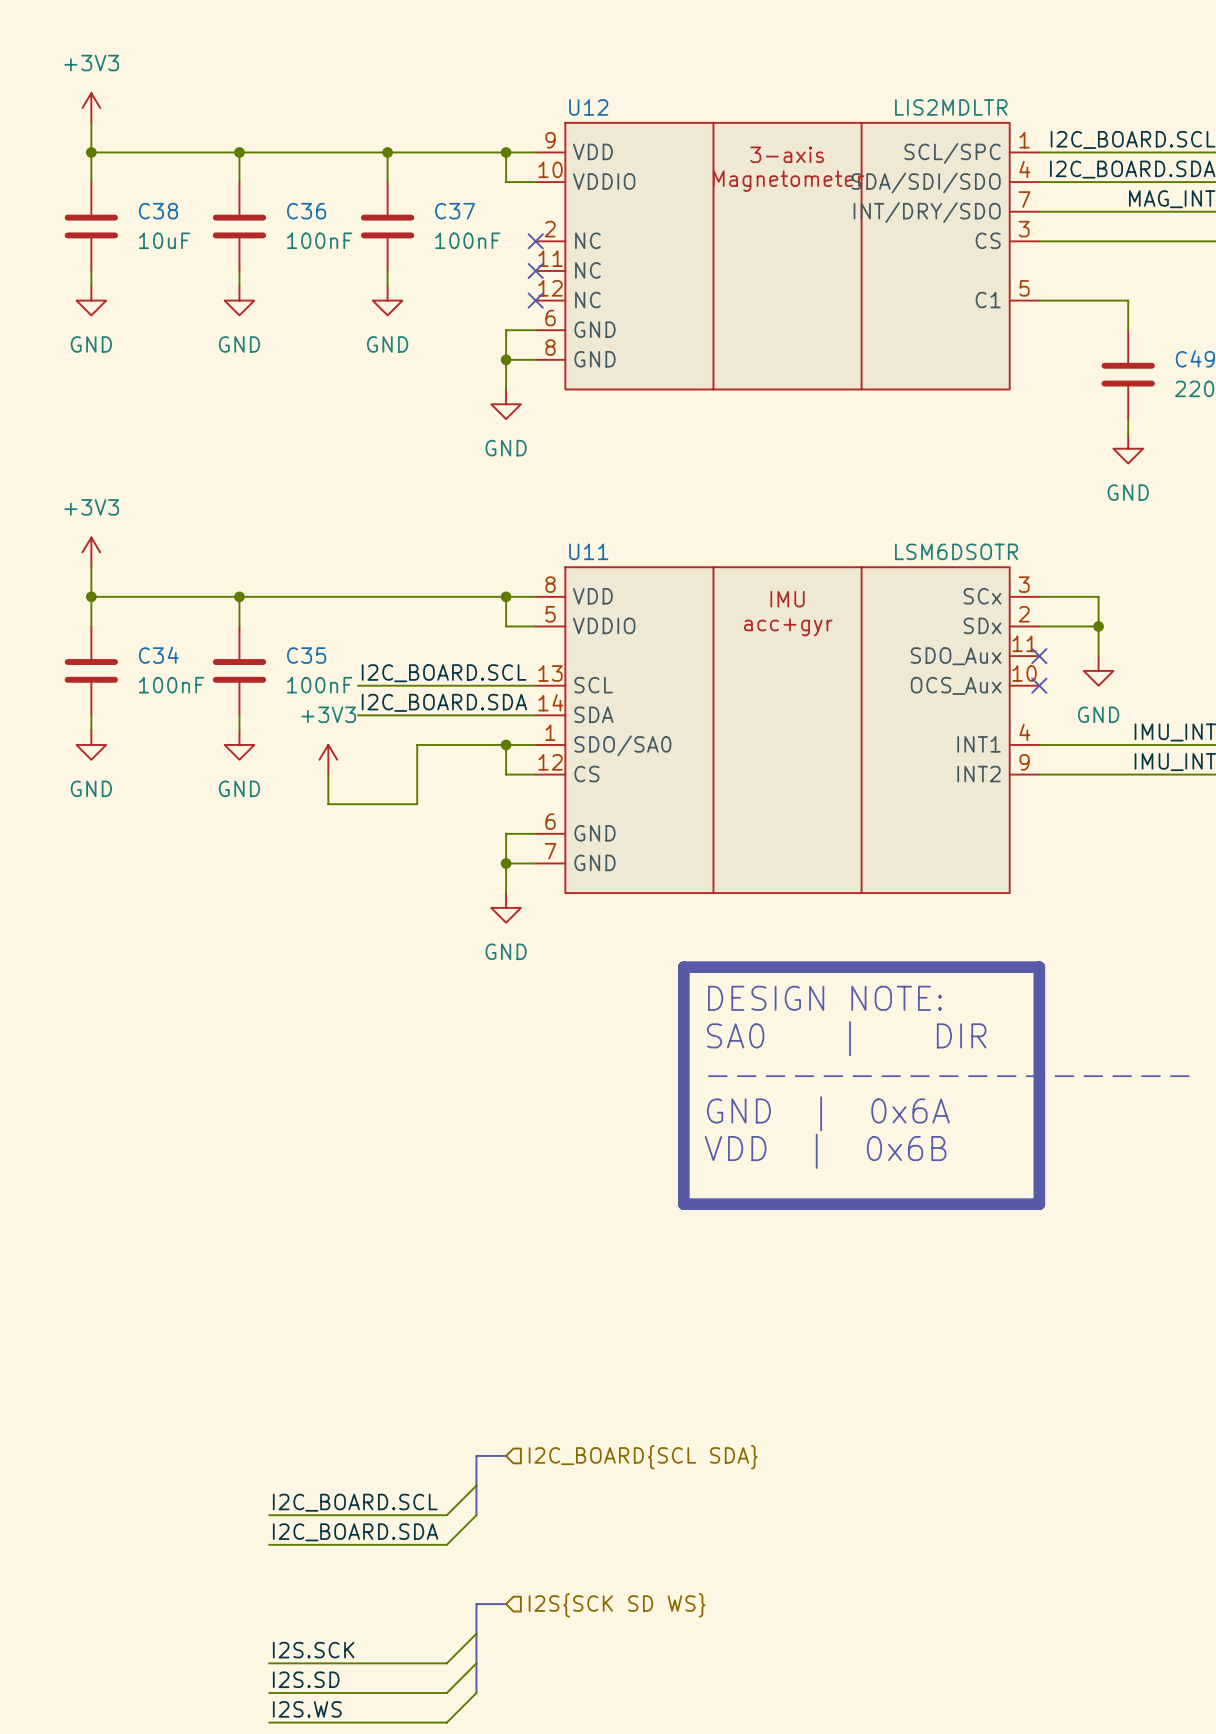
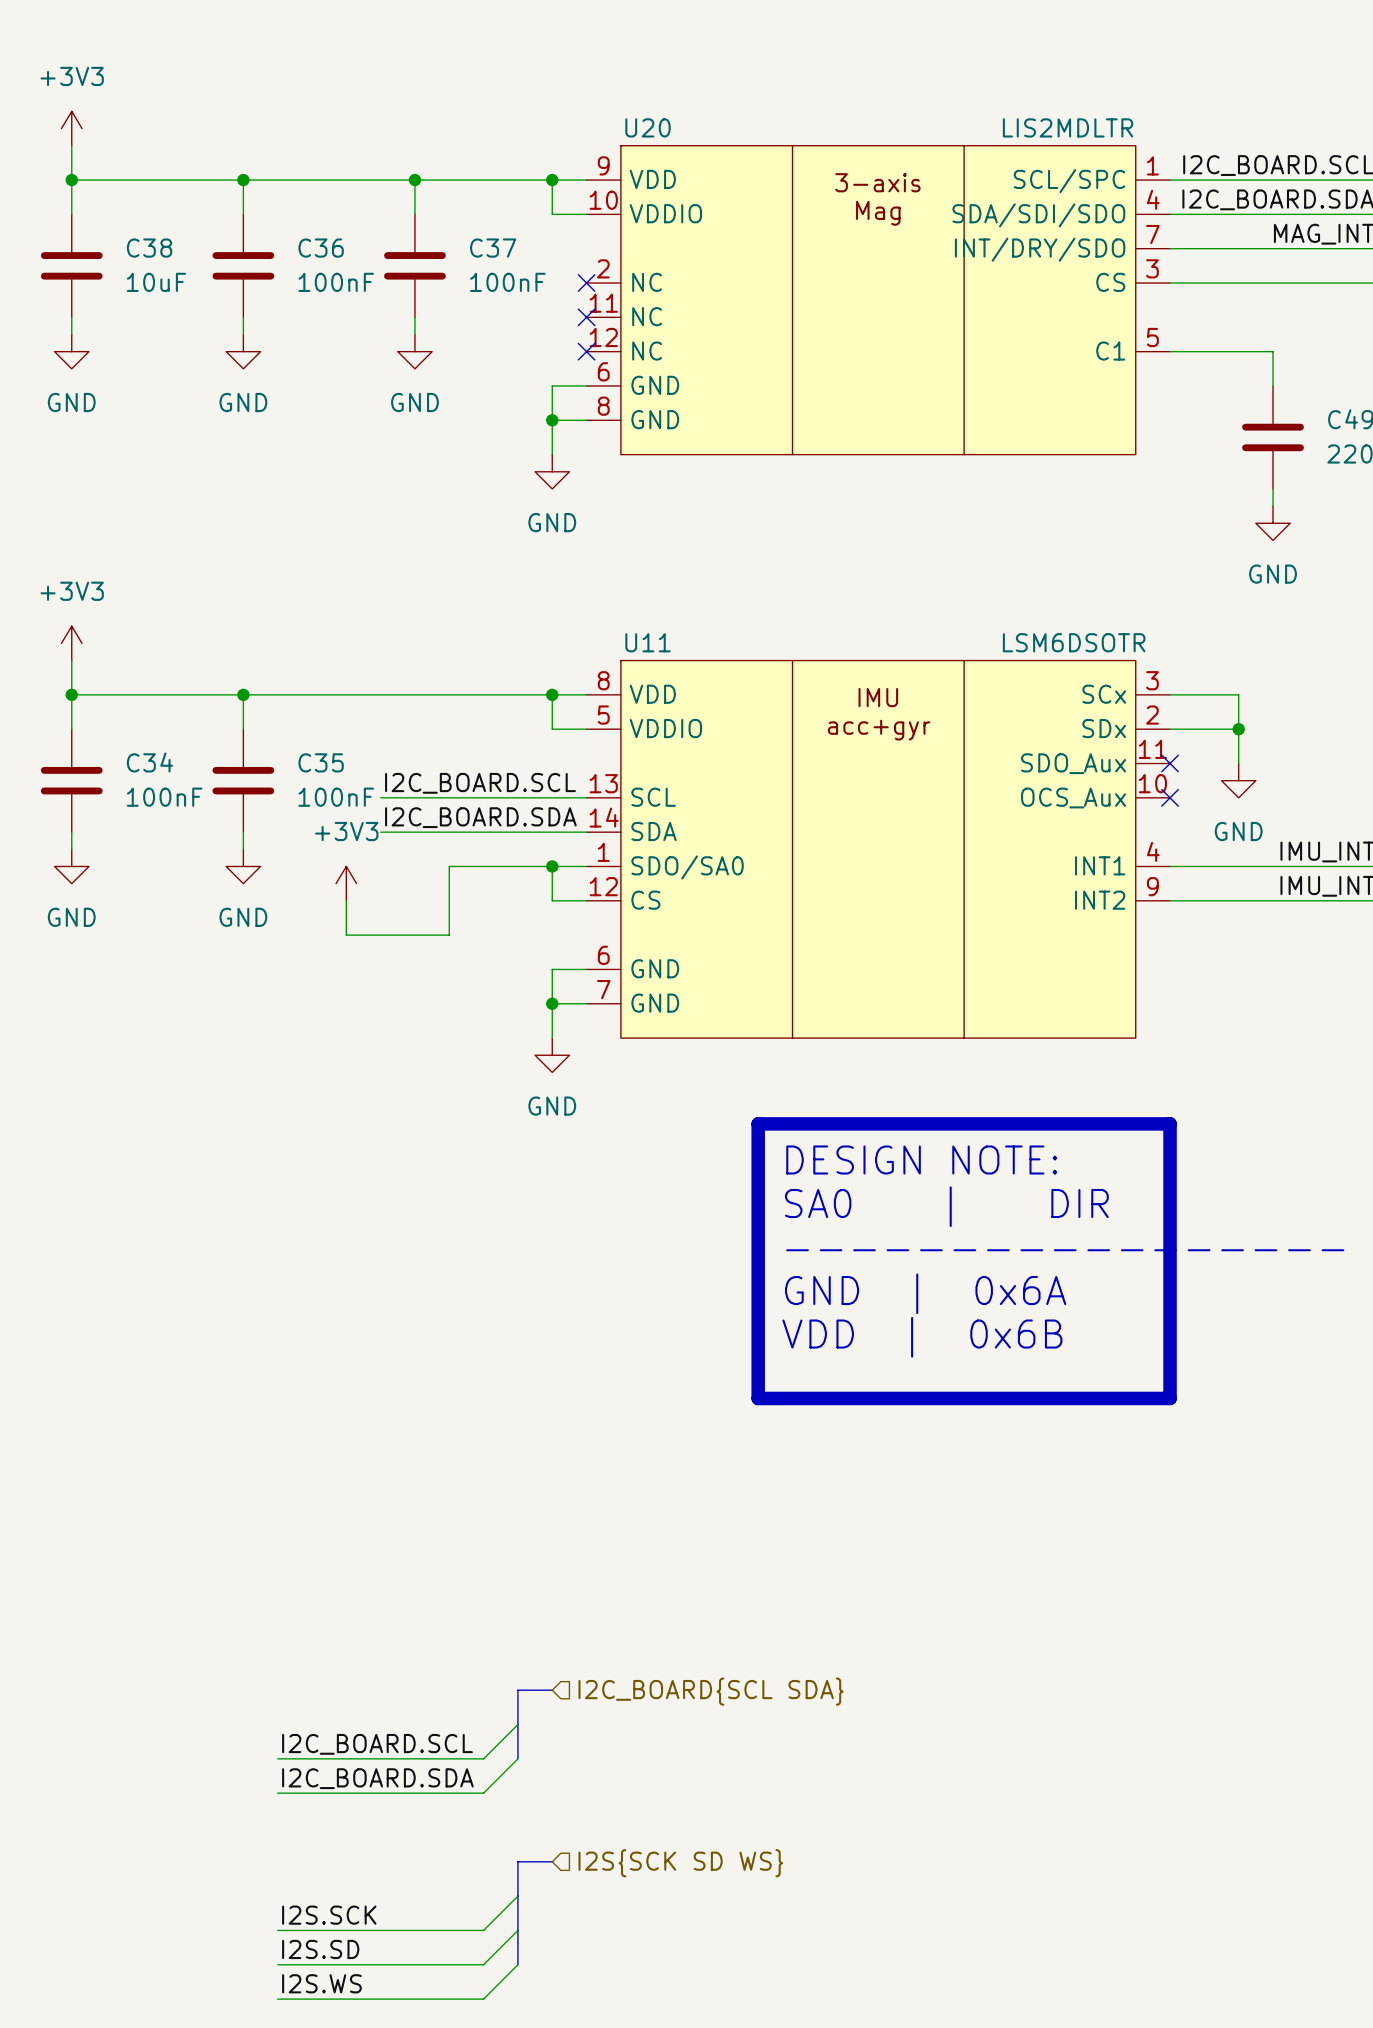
U12 name: U12 (588, 107) -> U20 (648, 127)
U12 text: Magnetometer (788, 181) -> Mag (878, 213)

